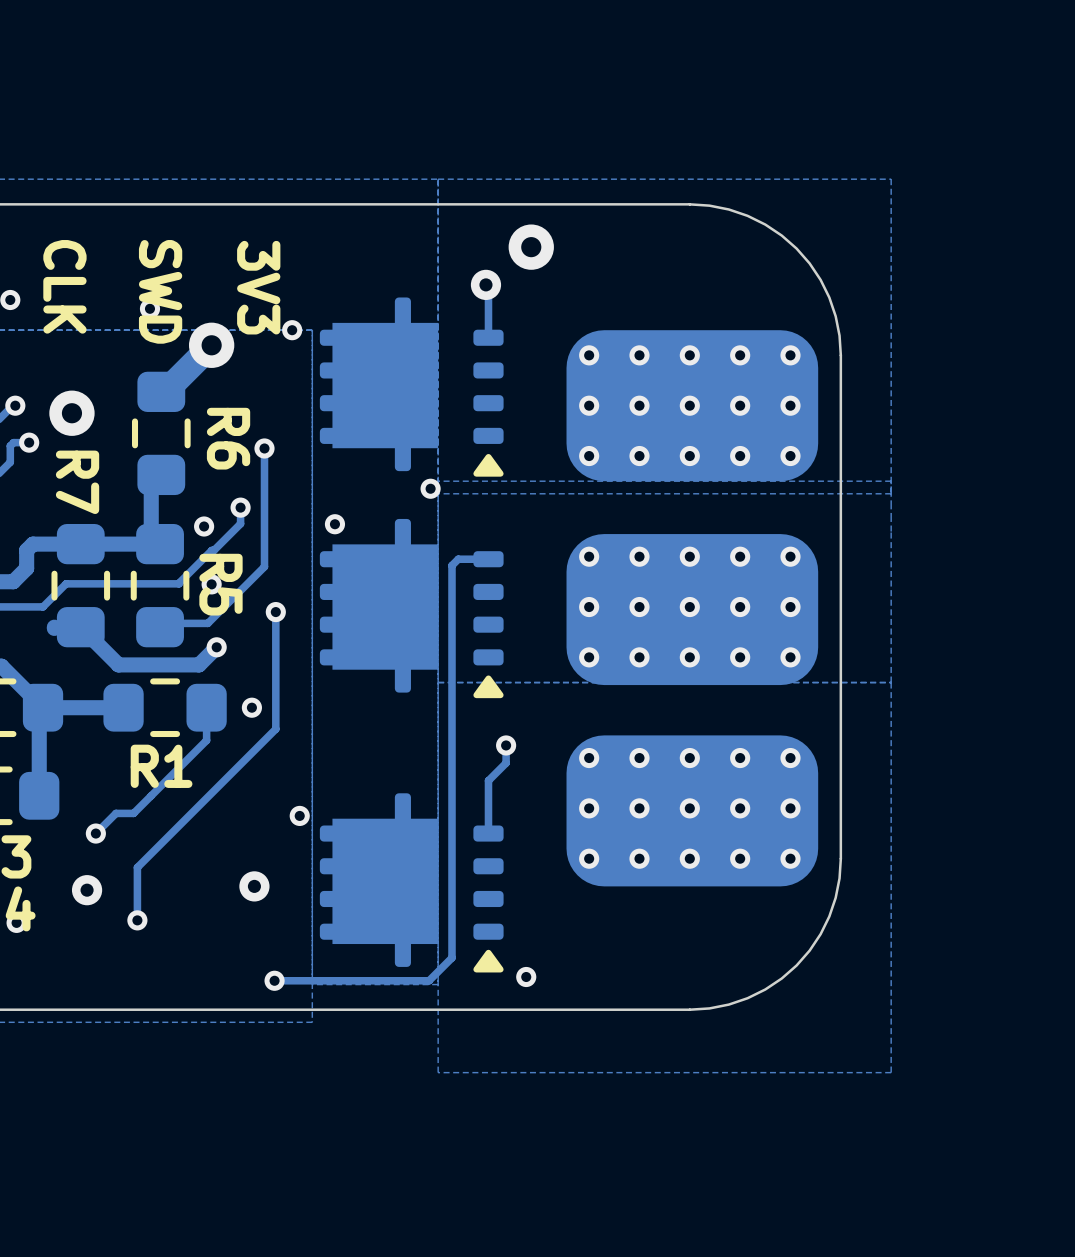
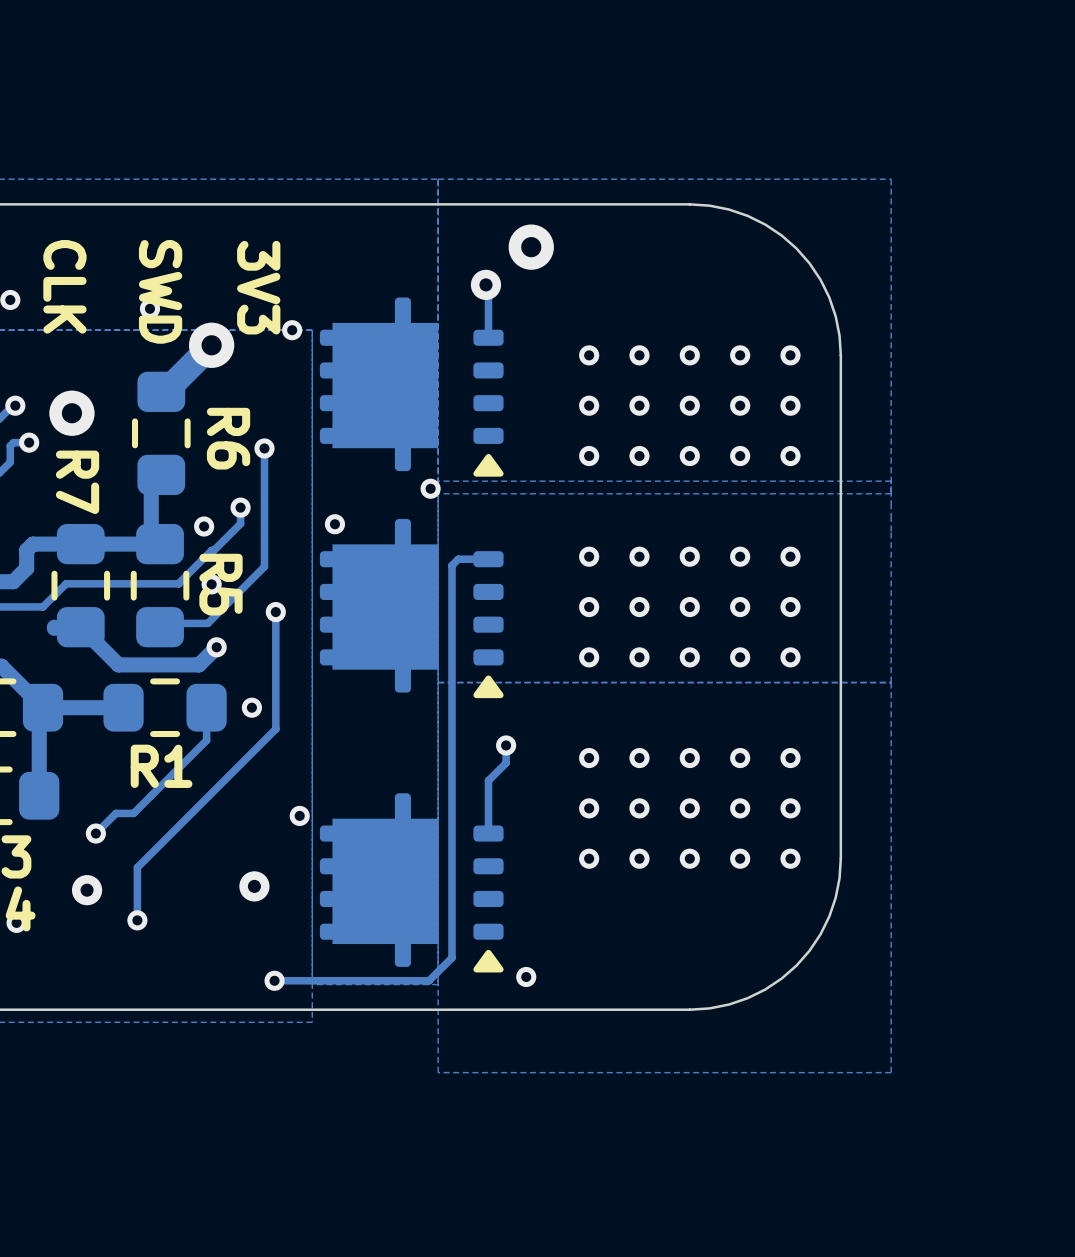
part: (692, 405) -> none
part: (692, 609) -> none
part: (692, 810) -> none

